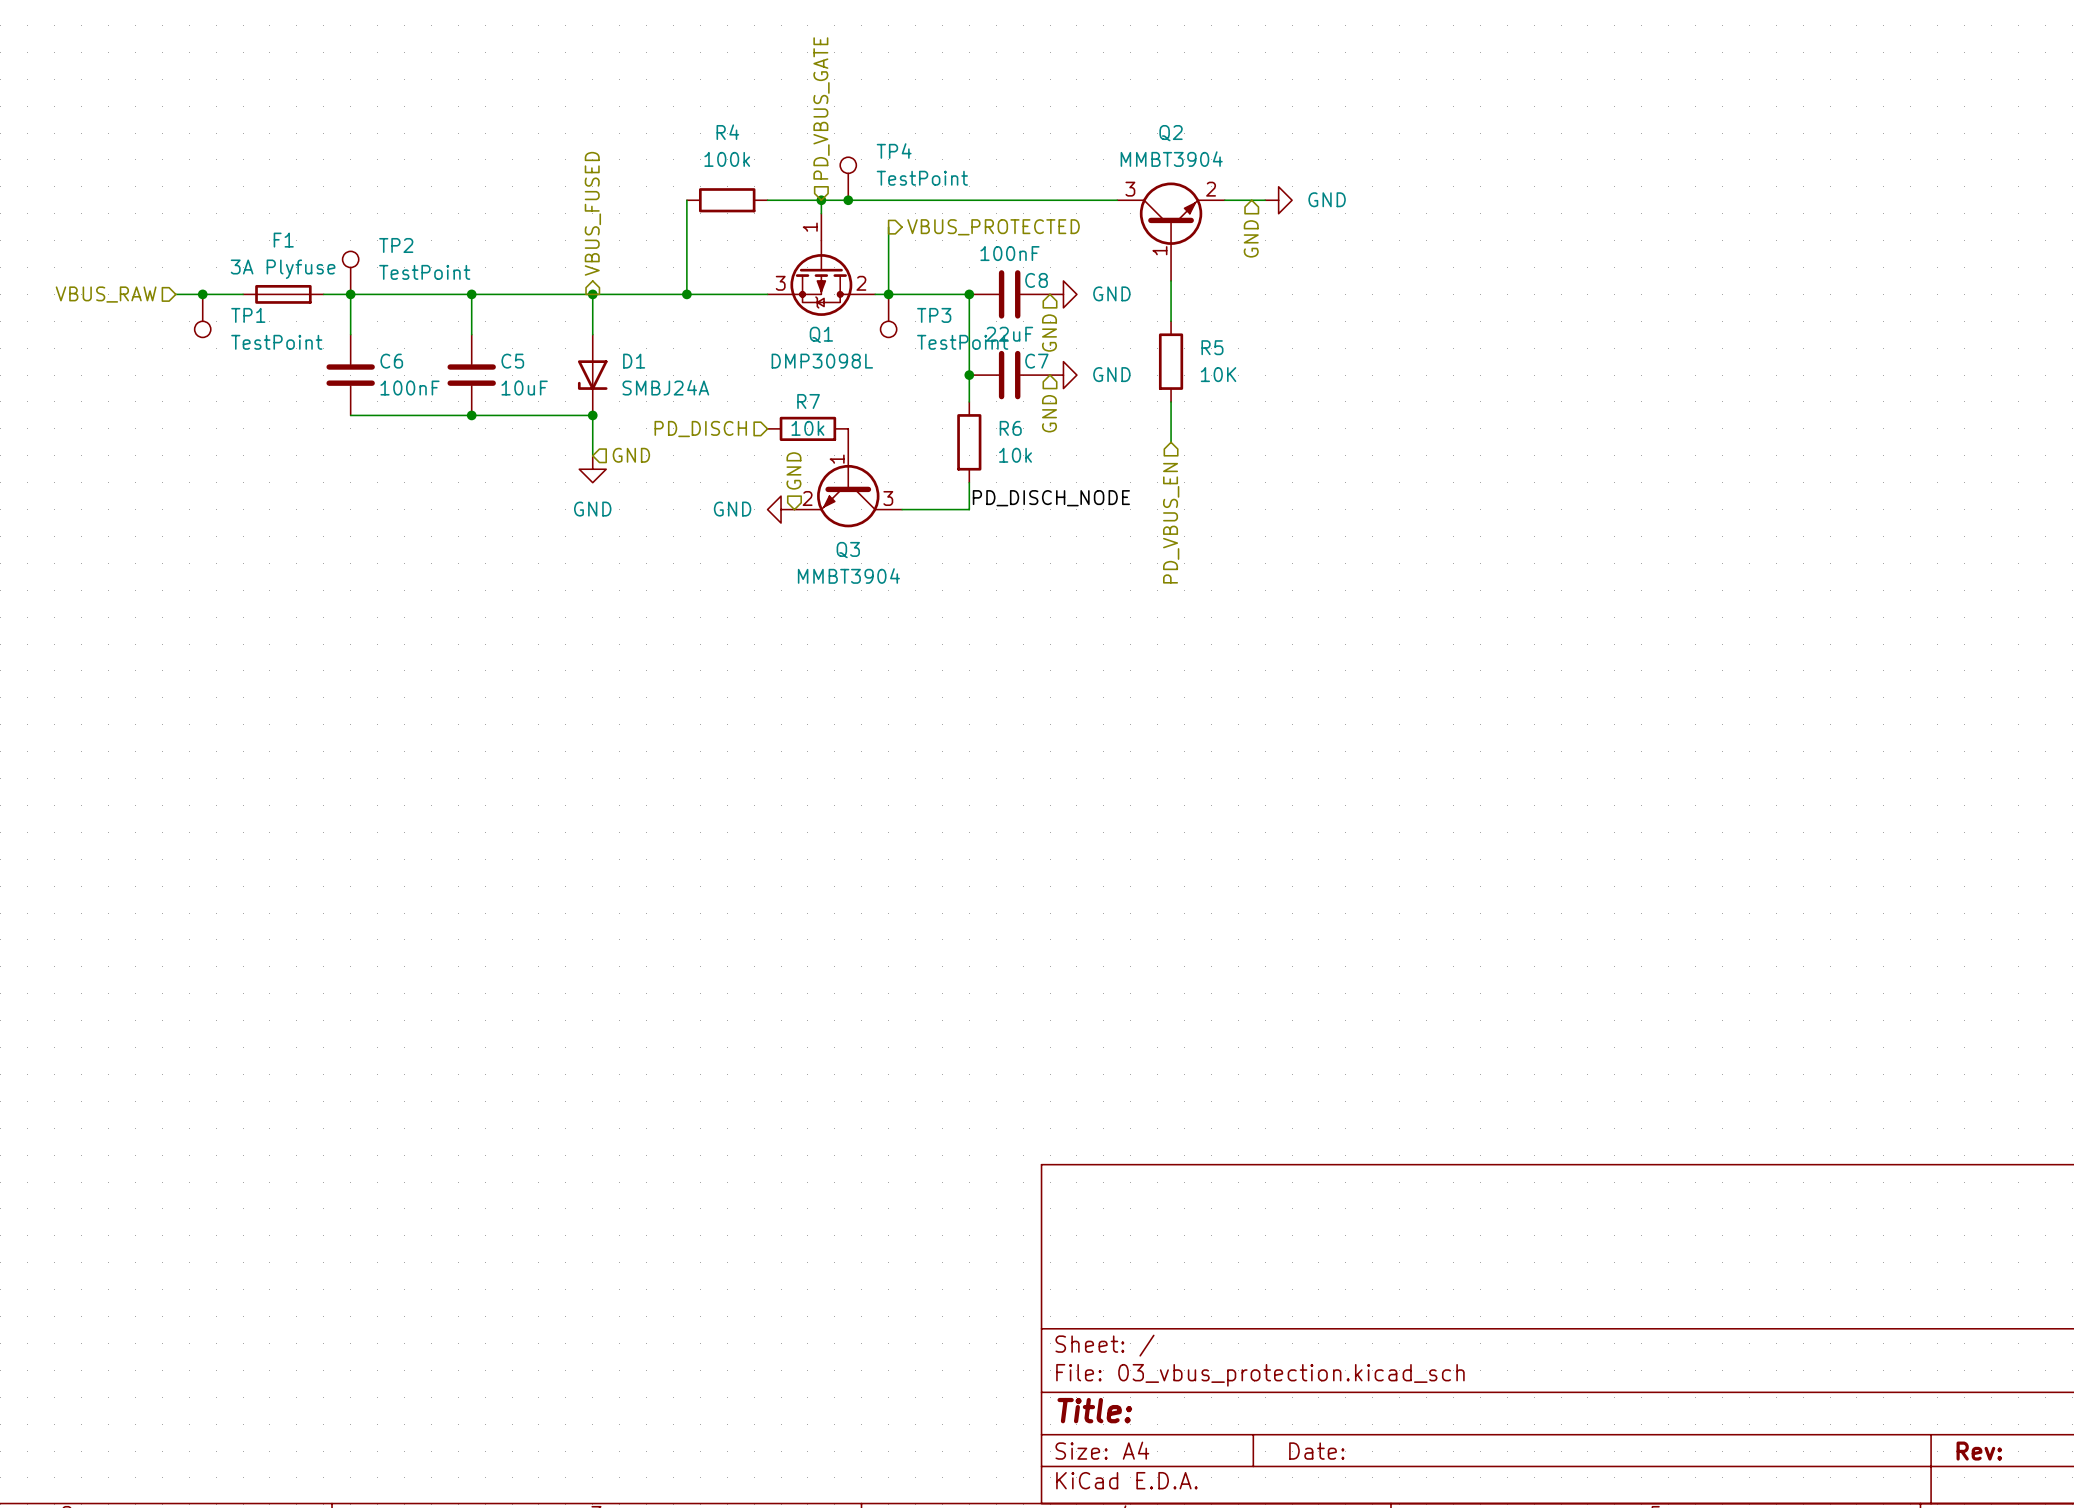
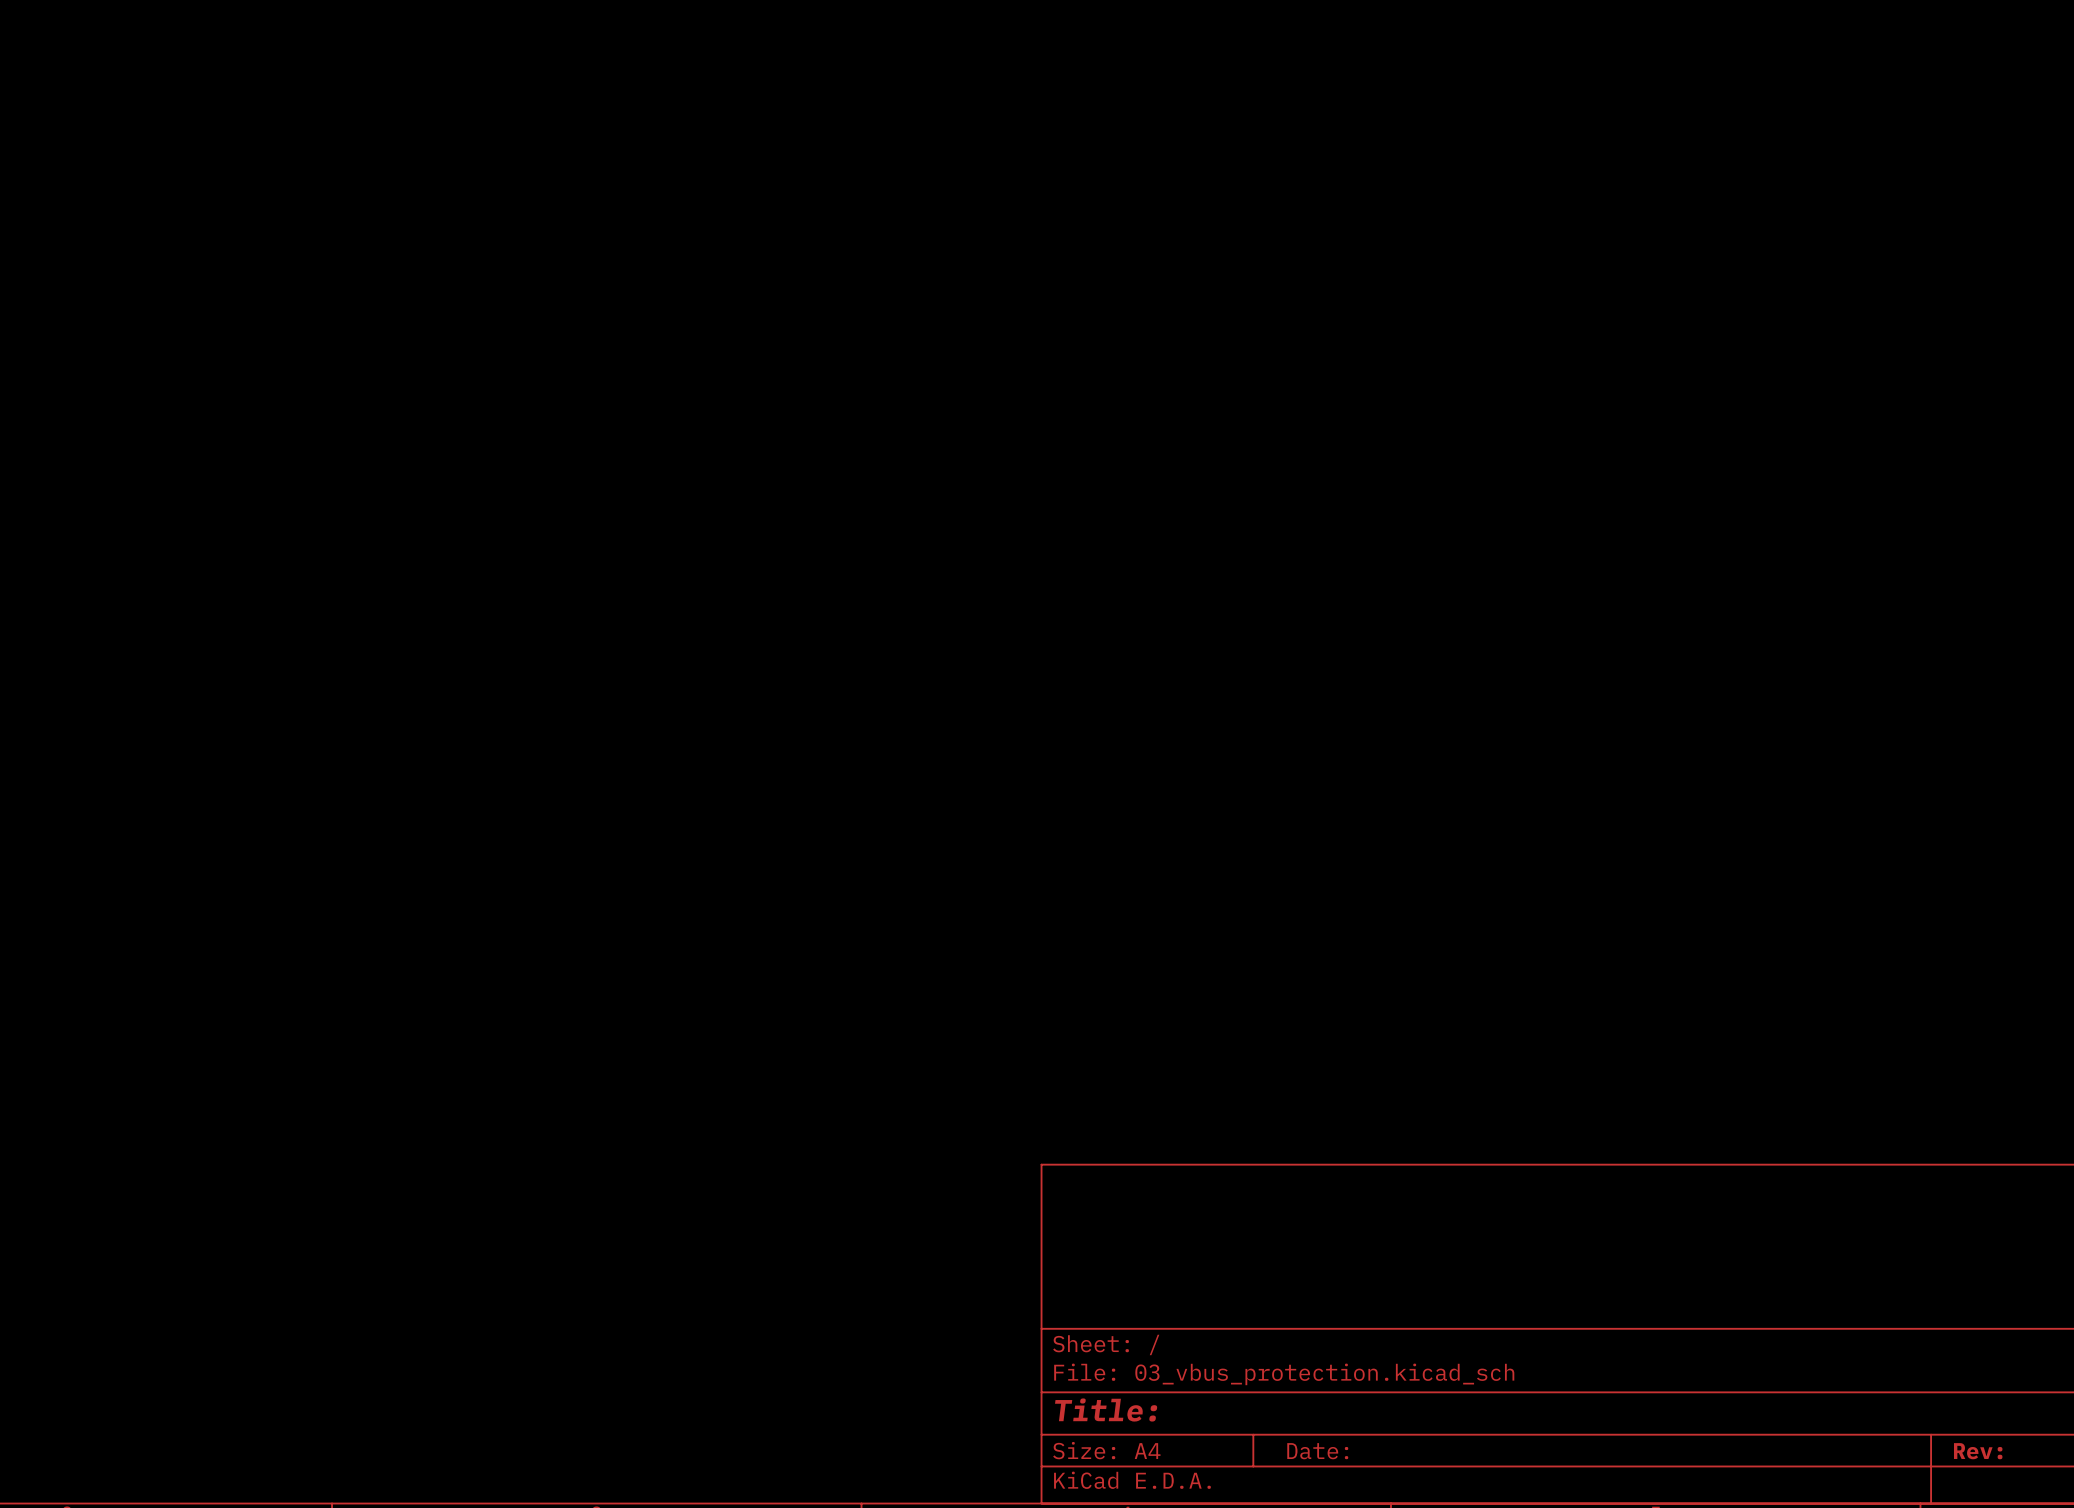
hierarchical label: PD_VBUS_GATE (821, 108) -> none
TP4: TestPoint (848, 178) -> none
wire: (686, 200) (686, 294) -> none
R4: 100k (727, 200) -> none
wire: (767, 200) (1117, 200) -> none
wire: (821, 200) (821, 213) -> none
junction: (821, 200) -> none
junction: (848, 200) -> none
wire: (1224, 200) (1265, 200) -> none
power symbol: GND (1278, 200) -> none
hierarchical label: VBUS_FUSED (592, 213) -> none
wire: (888, 227) (888, 294) -> none
hierarchical label: VBUS_PROTECTED (993, 227) -> none
Q2: MMBT3904 (1171, 231) -> none
hierarchical label: GND (1251, 238) -> none
Q1: DMP3098L (821, 264) -> none
TP2: TestPoint (350, 272) -> none
wire: (1171, 280) (1171, 321) -> none
hierarchical label: VBUS_RAW (106, 294) -> none
wire: (175, 294) (243, 294) -> none
junction: (202, 294) -> none
F1: 3A Plyfuse (283, 294) -> none
wire: (323, 294) (767, 294) -> none
wire: (350, 294) (350, 334) -> none
junction: (350, 294) -> none
wire: (471, 294) (471, 334) -> none
junction: (471, 294) -> none
wire: (592, 294) (592, 334) -> none
junction: (592, 294) -> none
junction: (686, 294) -> none
wire: (875, 294) (969, 294) (969, 401) -> none
junction: (888, 294) -> none
junction: (969, 294) -> none
C8: 100nF (1009, 294) -> none
power symbol: GND (1063, 294) -> none
TP1: TestPoint (202, 315) -> none
TP3: TestPoint (888, 315) -> none
hierarchical label: GND (1049, 333) -> none
R5: 10K (1171, 361) -> none
C6: 100nF (350, 375) -> none
C5: 10uF (471, 375) -> none
D1: SMBJ24A (592, 375) -> none
junction: (969, 375) -> none
C7: 22uF (1009, 375) -> none
power symbol: GND (1063, 375) -> none
wire: (1171, 401) (1171, 442) -> none
hierarchical label: GND (1049, 413) -> none
wire: (350, 415) (592, 415) (592, 455) -> none
junction: (471, 415) -> none
junction: (592, 415) -> none
R7: 10k (807, 428) -> none
hierarchical label: PD_DISCH (700, 429) -> none
R6: 10k (969, 442) -> none
hierarchical label: GND (631, 455) -> none
power symbol: GND (592, 469) -> none
hierarchical label: GND (793, 470) -> none
Q3: MMBT3904 (848, 478) -> none
wire: (969, 482) (969, 509) (902, 509) -> none
label: PD_DISCH_NODE (1051, 498) -> none
power symbol: GND (781, 509) -> none
hierarchical label: PD_VBUS_EN (1171, 523) -> none

